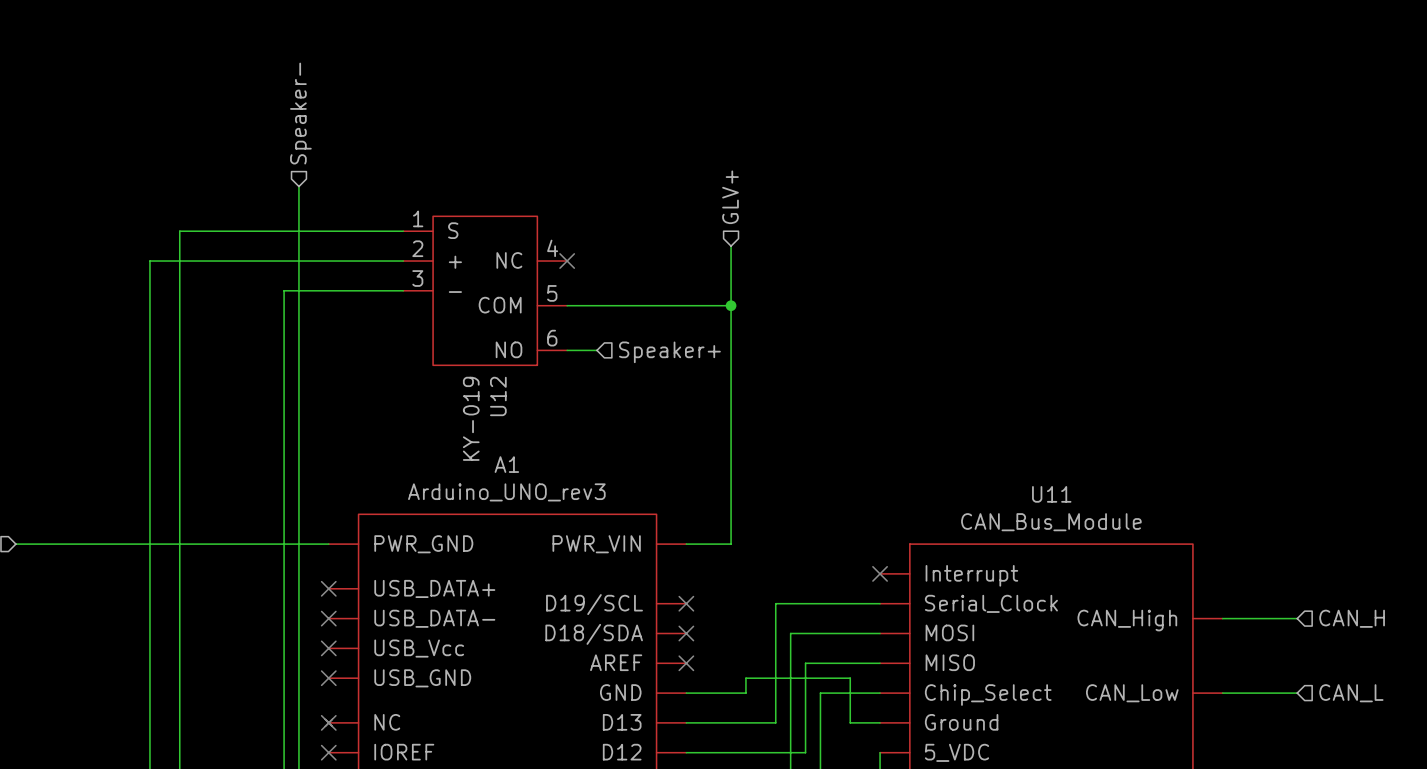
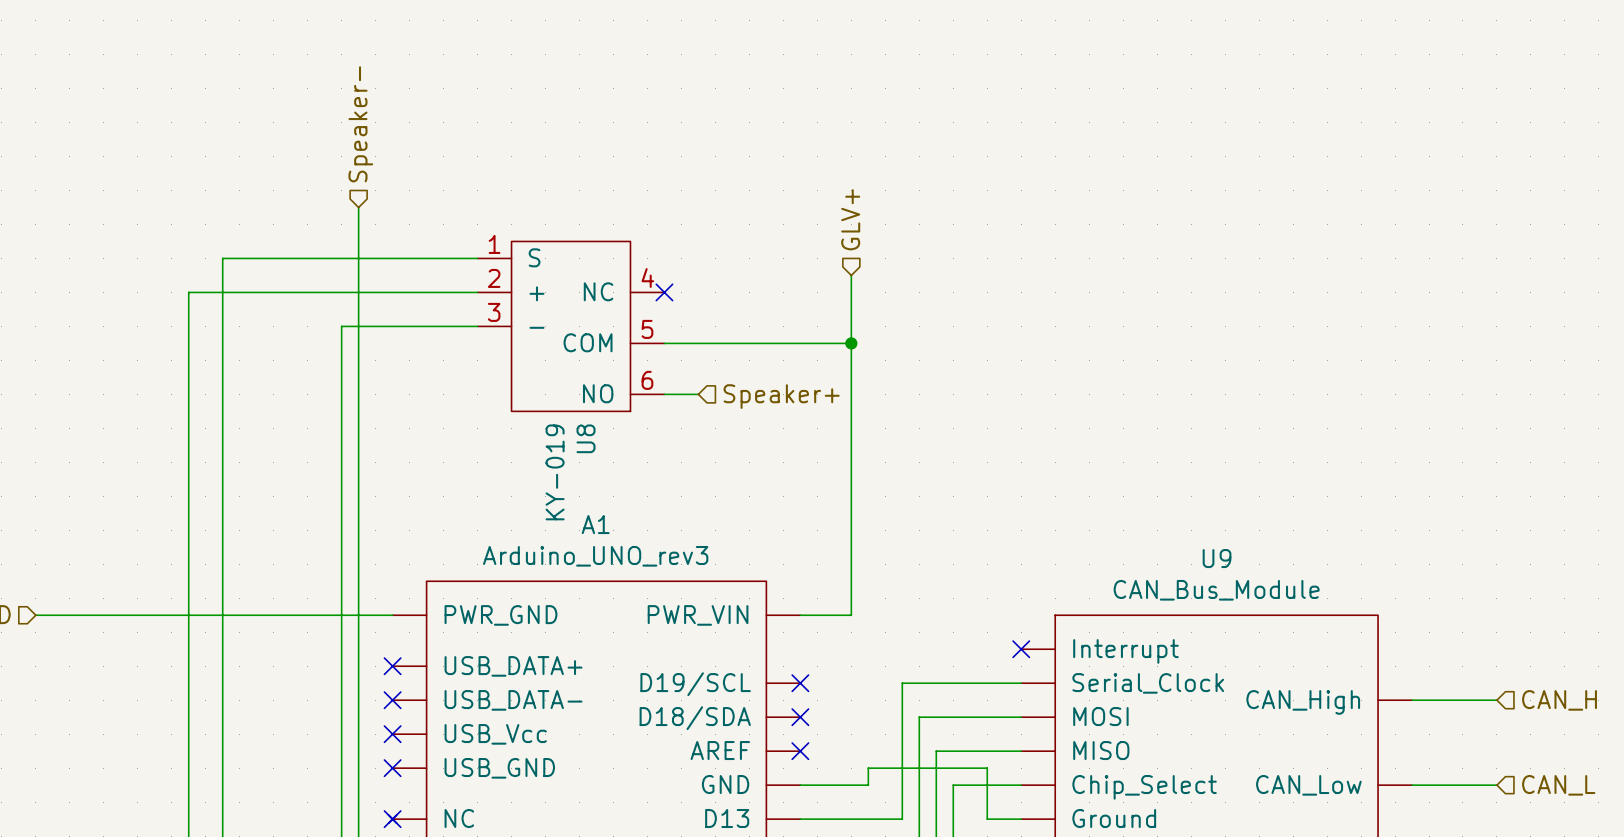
U12 name: U12 (498, 396) -> U8 (586, 438)
U11 name: U11 (1051, 494) -> U9 (1217, 558)

